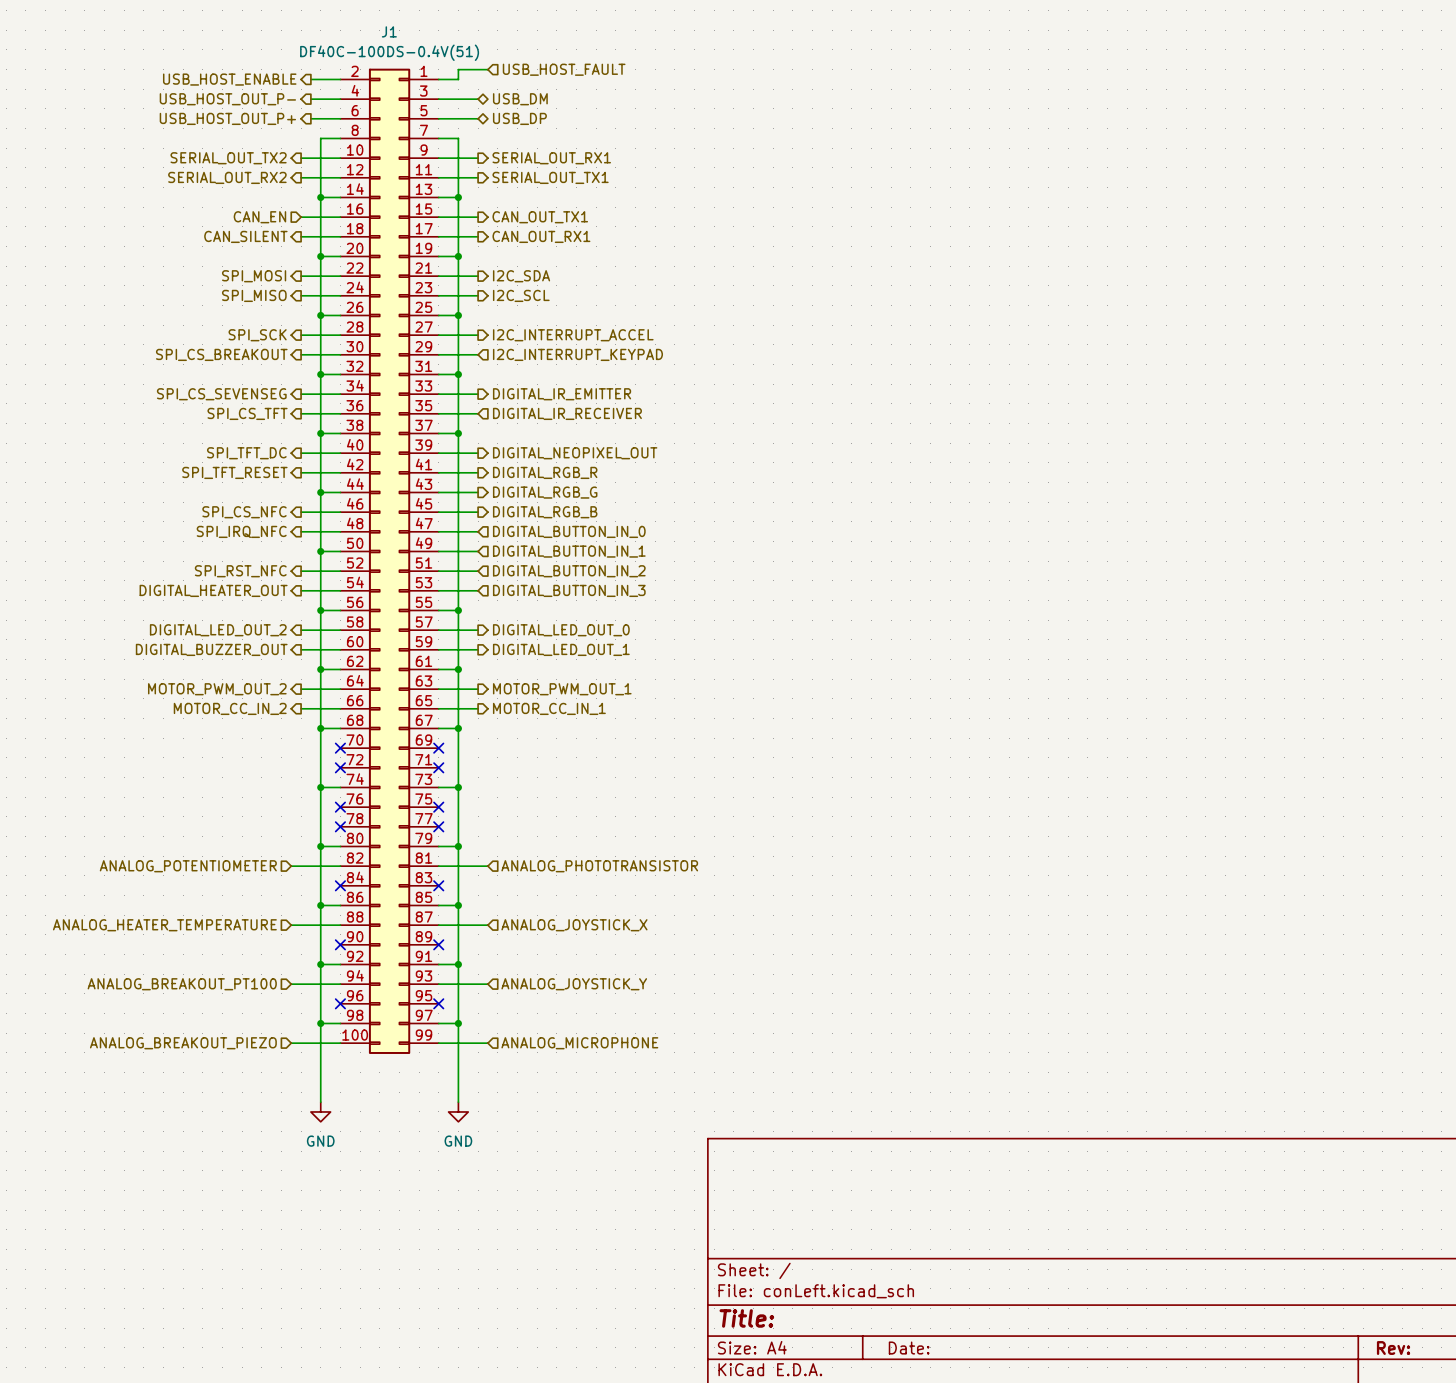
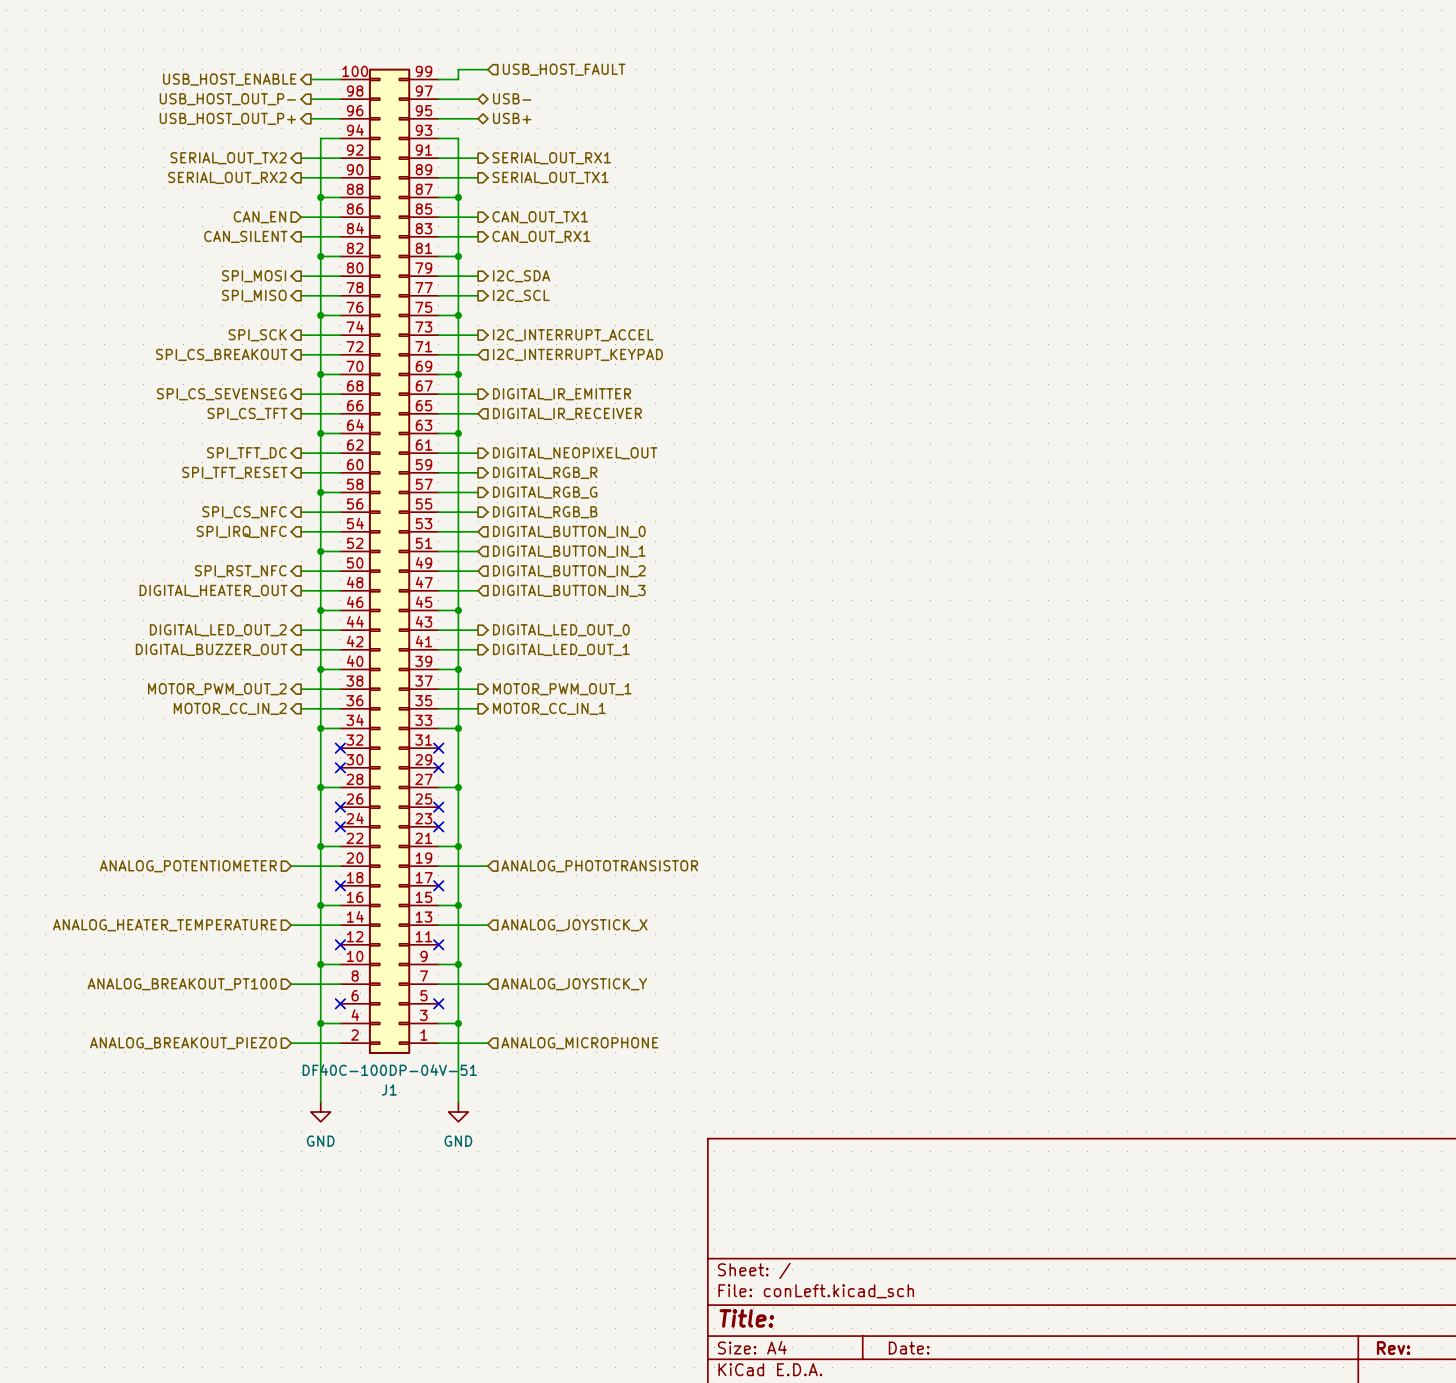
J1 value: DF40C-100DS-0.4V(51) (389, 52) -> DF40C-100DP-04V-51 (389, 1070)
hierarchical label: USB_DM (520, 99) -> USB- (512, 98)
hierarchical label: USB_DP (519, 118) -> USB+ (512, 118)
J1 flip: as is (389, 561) -> up-down (389, 561)

